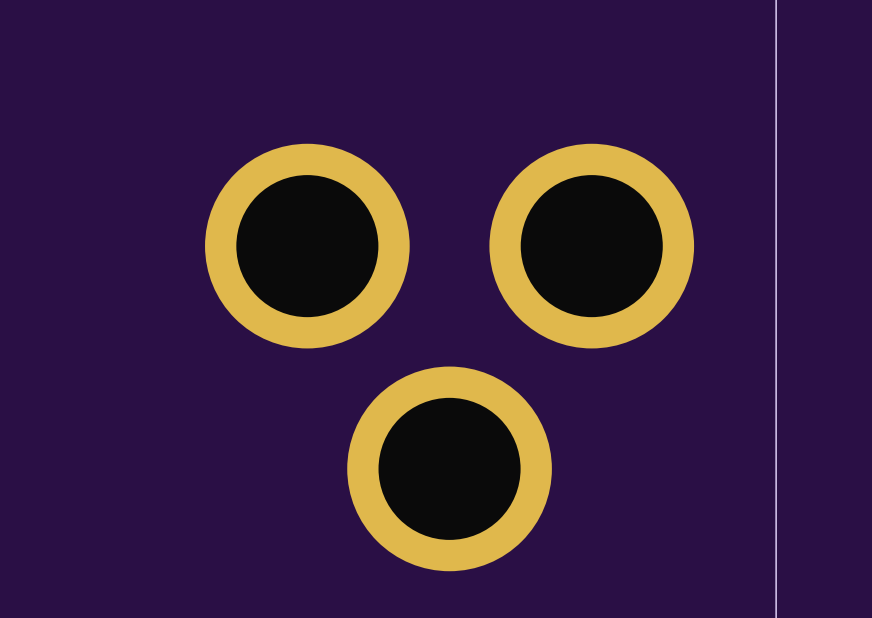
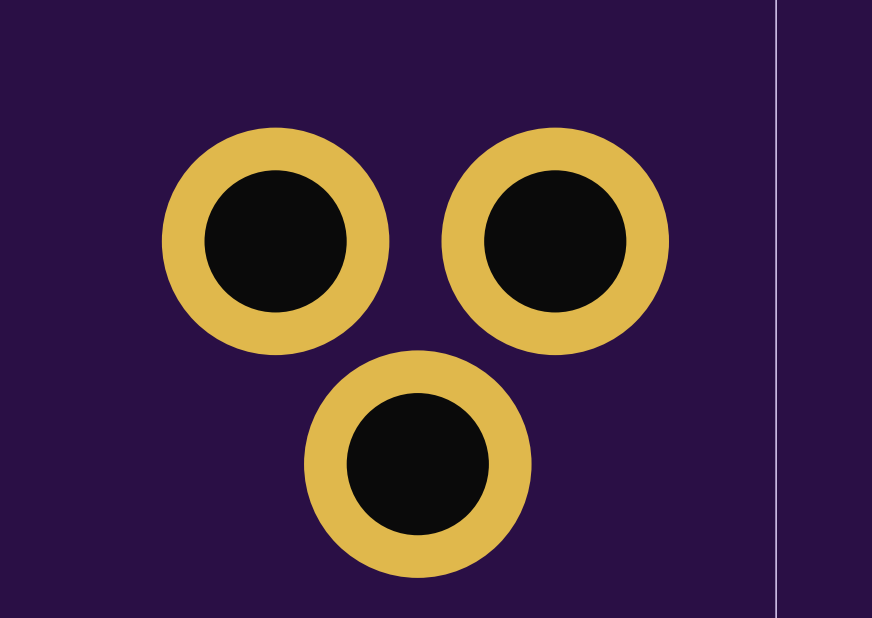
part footprint: [205, 143, 695, 572] -> [161, 127, 670, 578]

